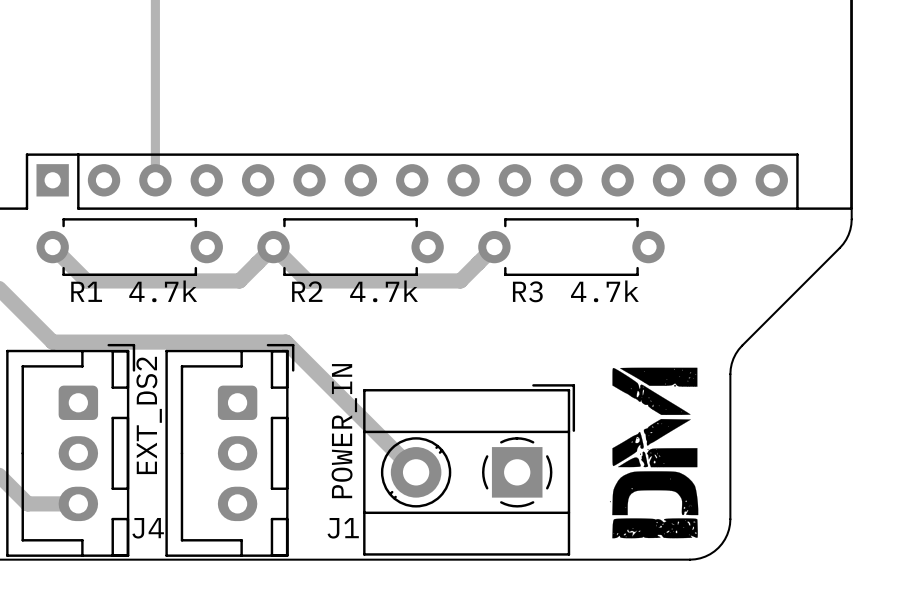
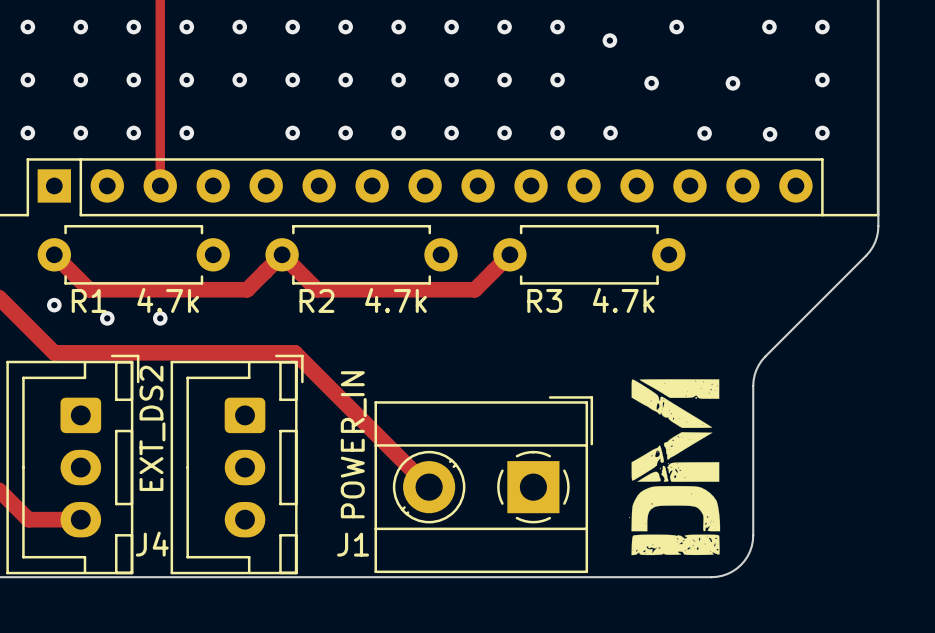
via: none -> (27, 27)
via: none -> (80, 27)
via: none -> (133, 27)
via: none -> (186, 27)
via: none -> (239, 27)
via: none -> (292, 27)
via: none -> (345, 27)
via: none -> (398, 27)
via: none -> (451, 27)
via: none -> (504, 27)
via: none -> (557, 27)
via: none -> (676, 27)
via: none -> (769, 27)
via: none -> (822, 27)
via: none -> (609, 40)
via: none -> (27, 80)
via: none -> (80, 80)
via: none -> (133, 80)
via: none -> (186, 80)
via: none -> (239, 80)
via: none -> (292, 80)
via: none -> (345, 80)
via: none -> (398, 80)
via: none -> (451, 80)
via: none -> (504, 80)
via: none -> (557, 80)
via: none -> (822, 80)
via: none -> (651, 83)
via: none -> (732, 83)
via: none -> (27, 132)
via: none -> (80, 132)
via: none -> (133, 132)
via: none -> (186, 132)
via: none -> (292, 132)
via: none -> (345, 132)
via: none -> (398, 132)
via: none -> (451, 132)
via: none -> (504, 132)
via: none -> (557, 132)
via: none -> (610, 132)
via: none -> (822, 132)
via: none -> (704, 133)
via: none -> (770, 134)
via: none -> (54, 305)
via: none -> (107, 318)
via: none -> (160, 318)

